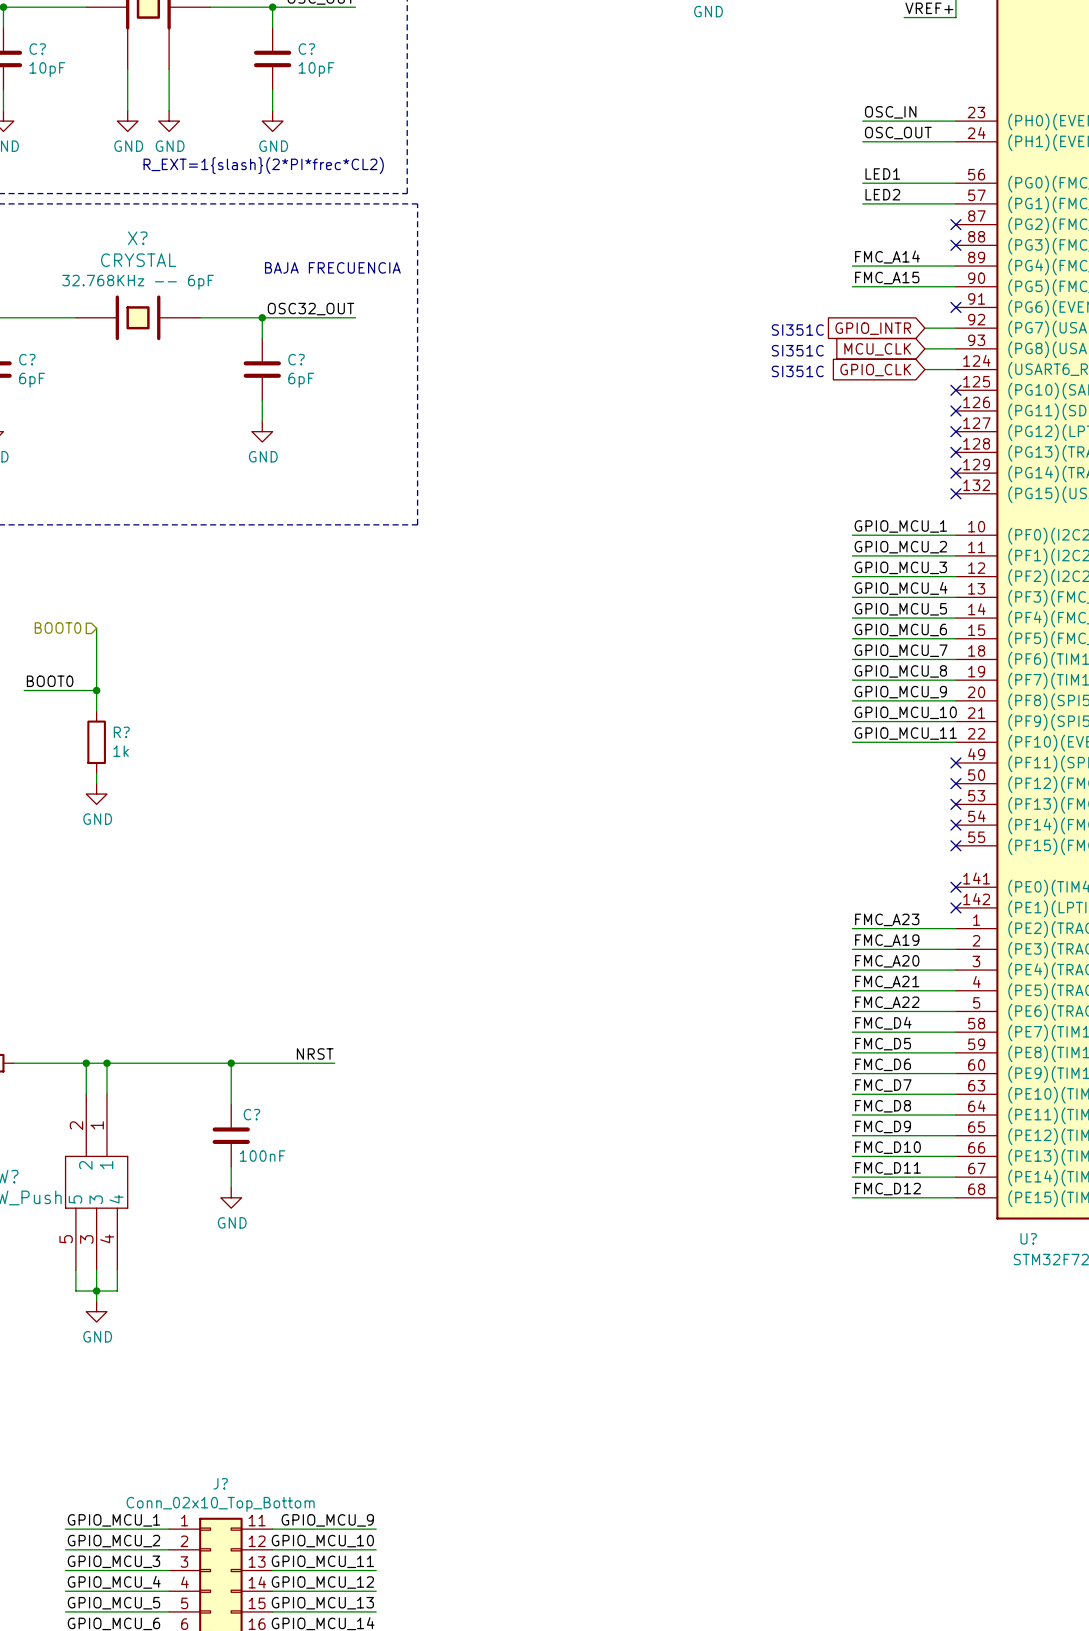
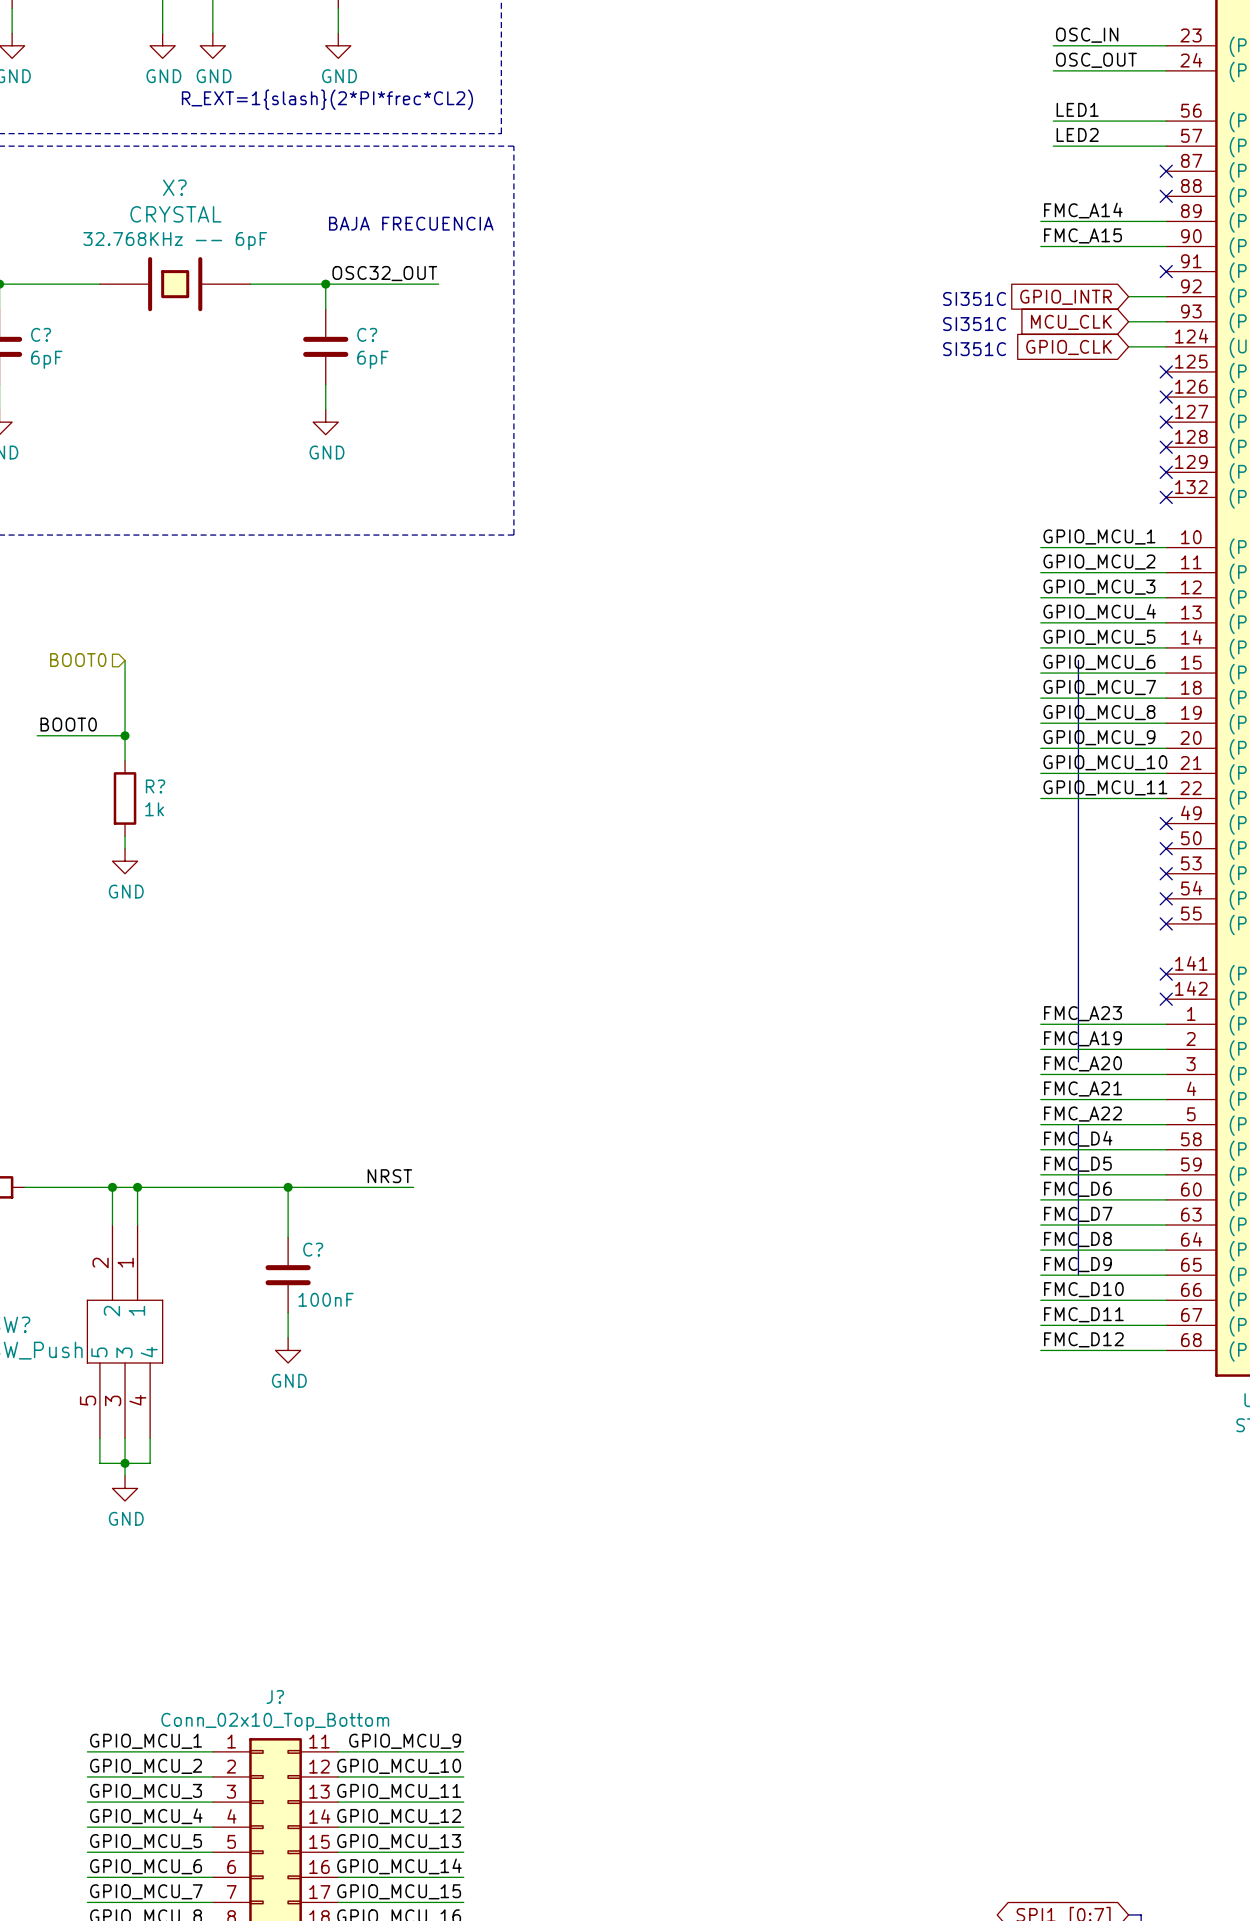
bus: none -> (1078, 660) (1078, 1061)
bus: none -> (1078, 1124) (1078, 1275)

